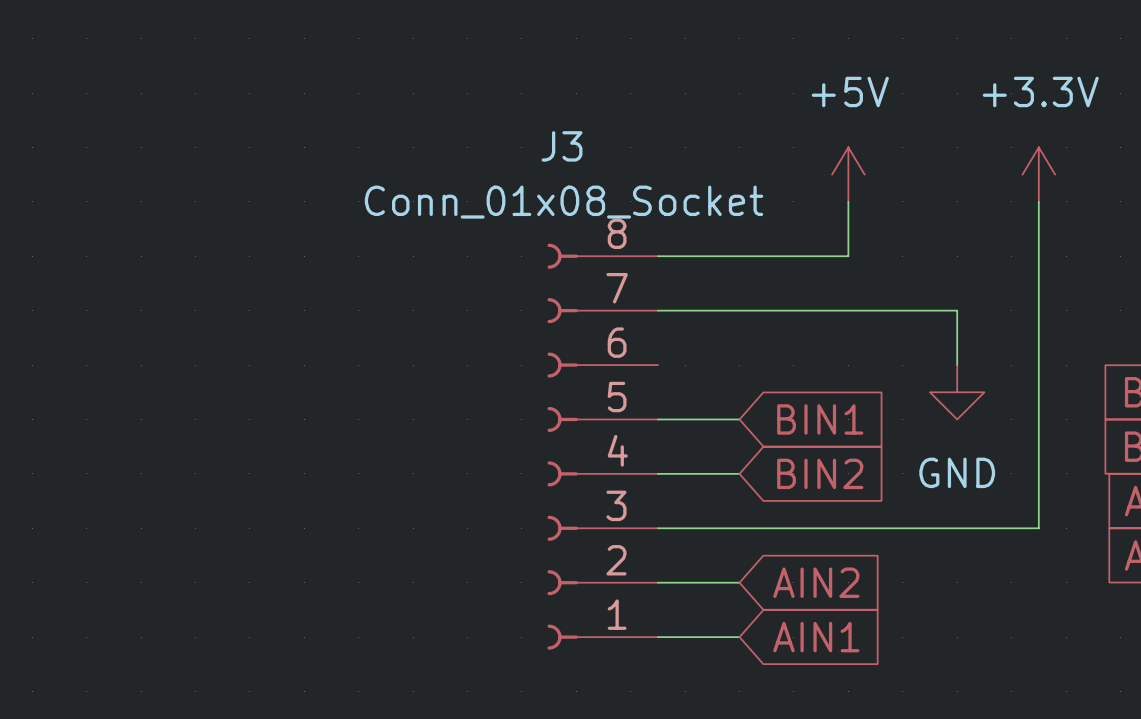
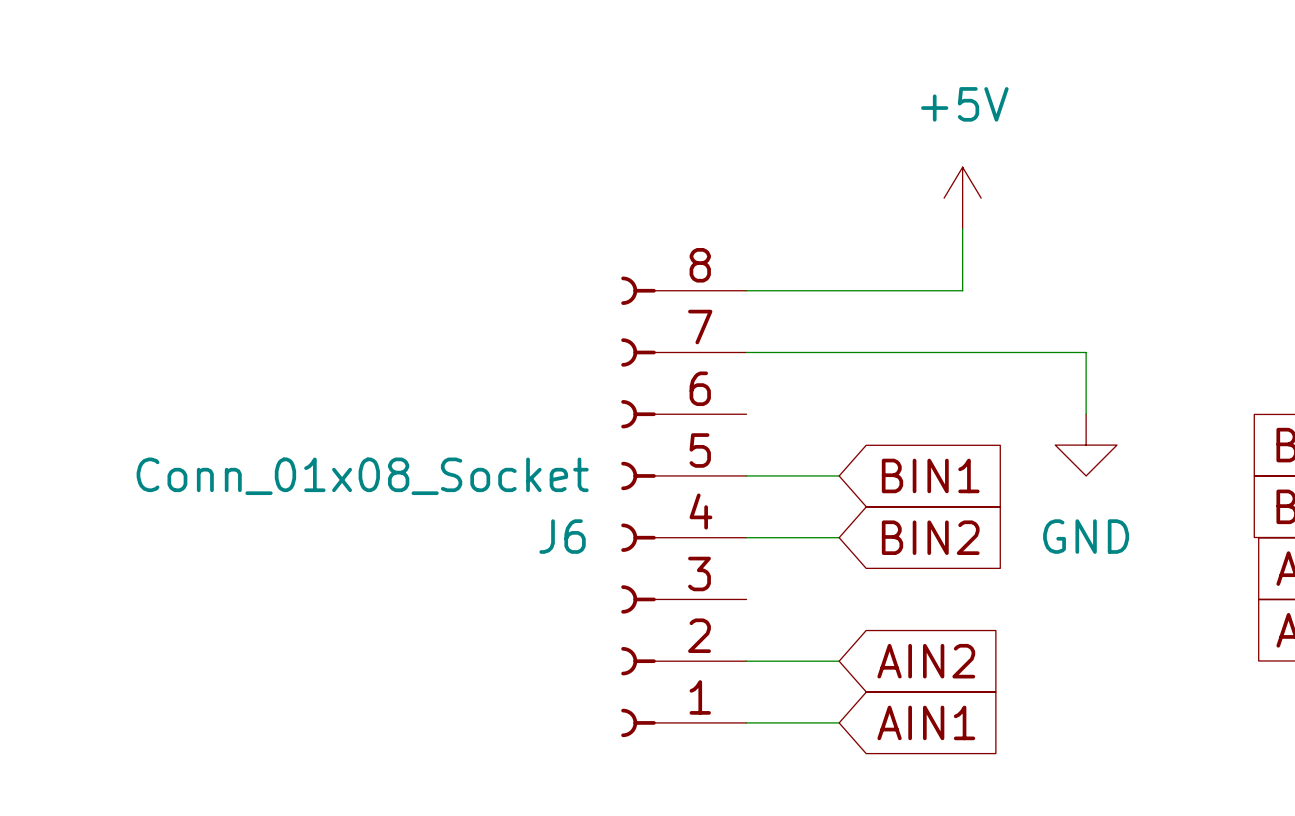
J3 name: J3 (562, 146) -> J6 (562, 536)
power symbol: +3.3V (1038, 174) -> none
wire: (1038, 201) (1038, 528) (657, 528) -> none
J3 value position: Conn_01x08_Socket (564, 202) -> Conn_01x08_Socket (362, 476)

